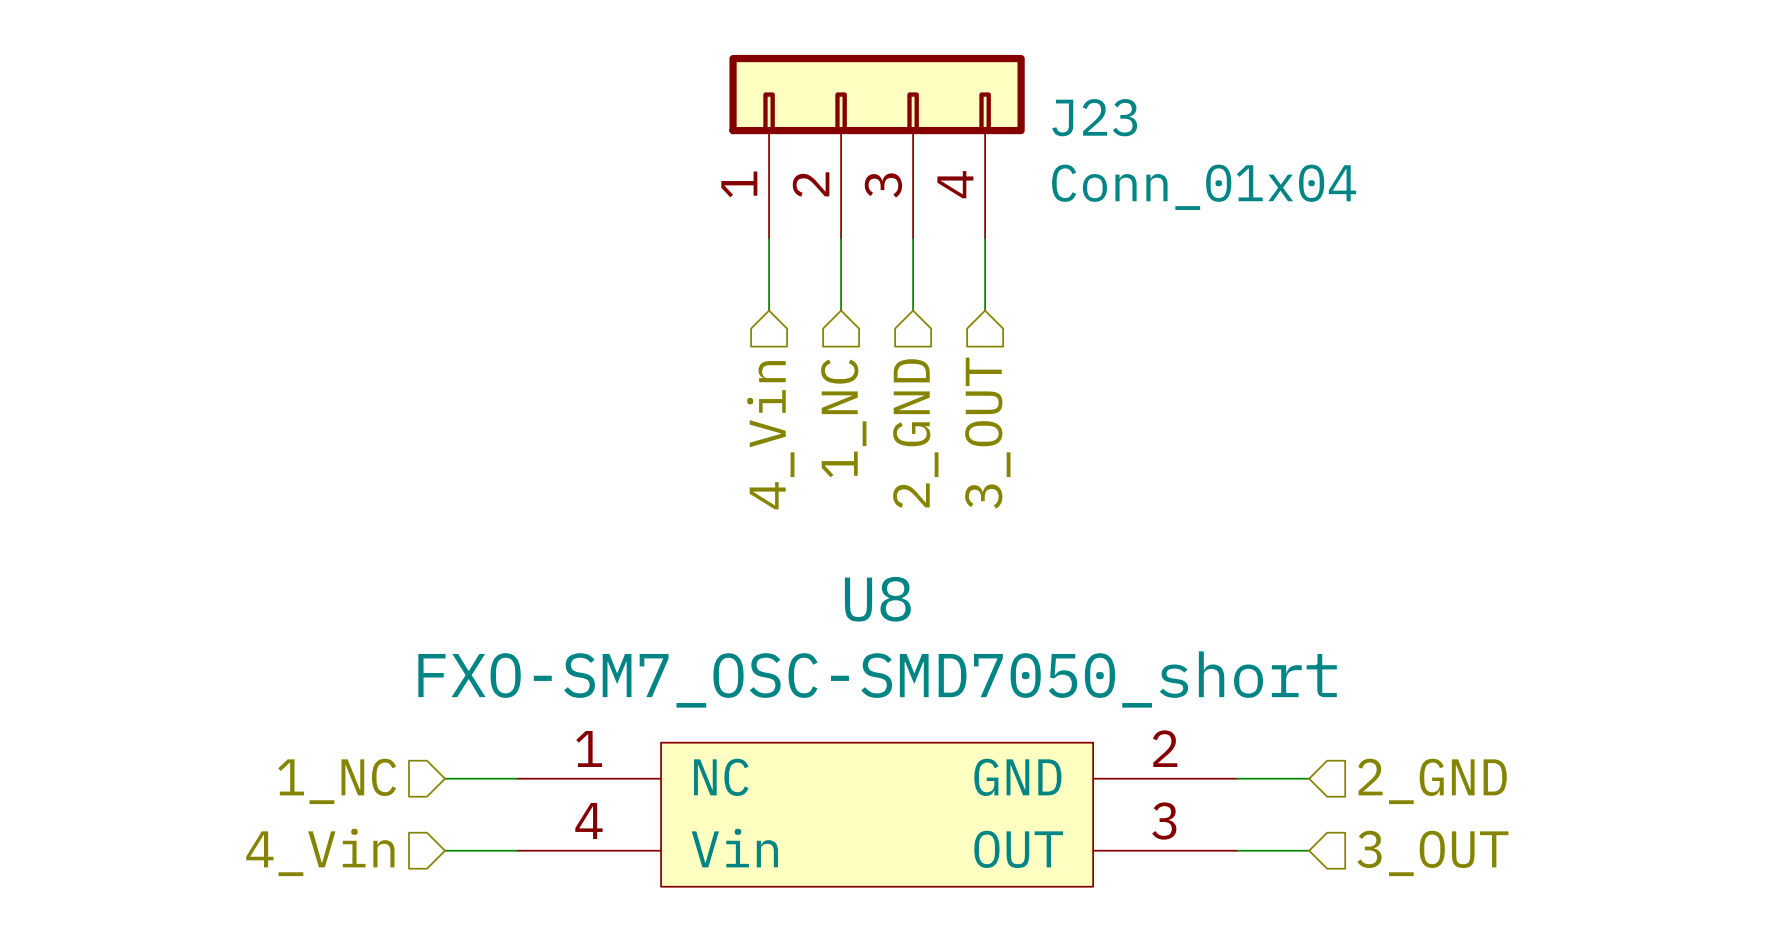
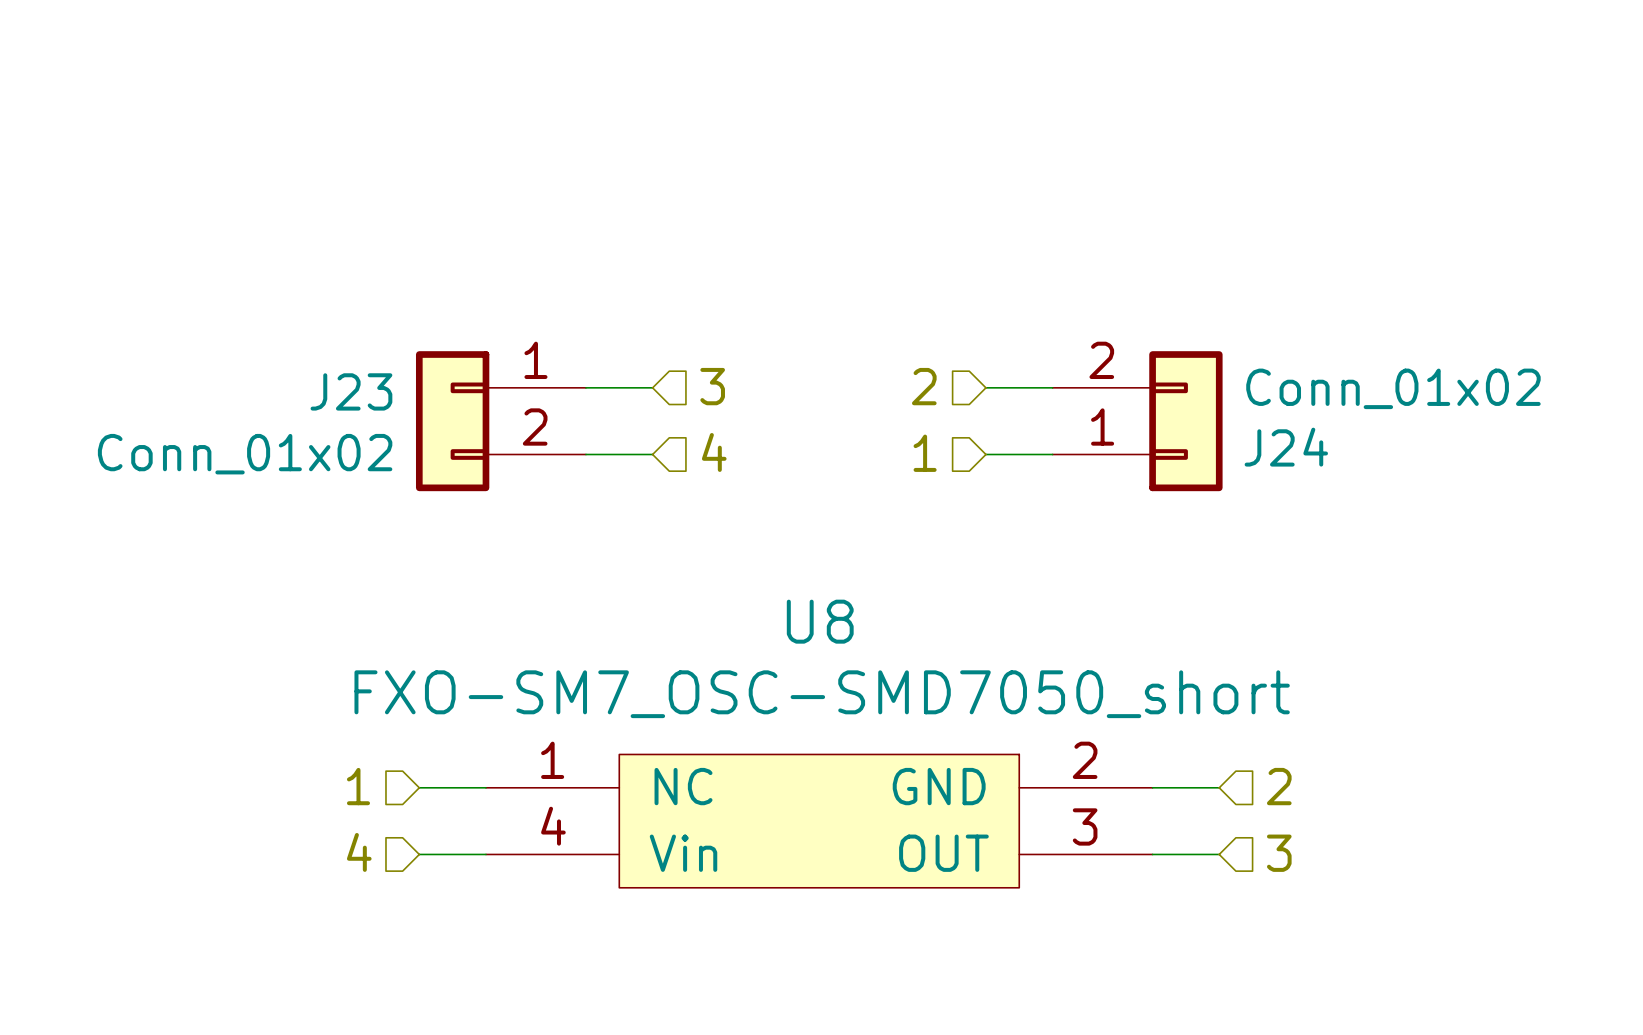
J23 symbol: [729, 54, 1025, 239] -> [415, 351, 586, 492]
J23 name position: J23 (1094, 117) -> J23 (351, 391)
J23 value: Conn_01x04 (1204, 187) -> Conn_01x02 (245, 454)
wire: (769, 238) (769, 310) -> none
wire: (841, 238) (841, 310) -> none
wire: (913, 238) (913, 310) -> none
wire: (985, 238) (985, 310) -> none
wire: none -> (585, 387) (652, 387)
wire: none -> (985, 387) (1052, 387)
J24: none -> Conn_01x02 (1137, 421)
hierarchical label: none -> 4 (714, 452)
hierarchical label: none -> 1 (925, 453)
wire: none -> (585, 454) (652, 454)
hierarchical label: 1_NC (843, 418) -> none
wire: none -> (985, 454) (1052, 454)
hierarchical label: 2_GND (915, 433) -> none
hierarchical label: 3_OUT (987, 433) -> 2 (924, 386)
hierarchical label: 4_Vin (770, 435) -> 3 (712, 386)
hierarchical label: 1_NC (337, 781) -> 1 (358, 786)
hierarchical label: 2_GND (1432, 781) -> 2 (1279, 786)
hierarchical label: 4_Vin (320, 852) -> 4 (359, 852)
hierarchical label: 3_OUT (1432, 853) -> 3 (1279, 853)

